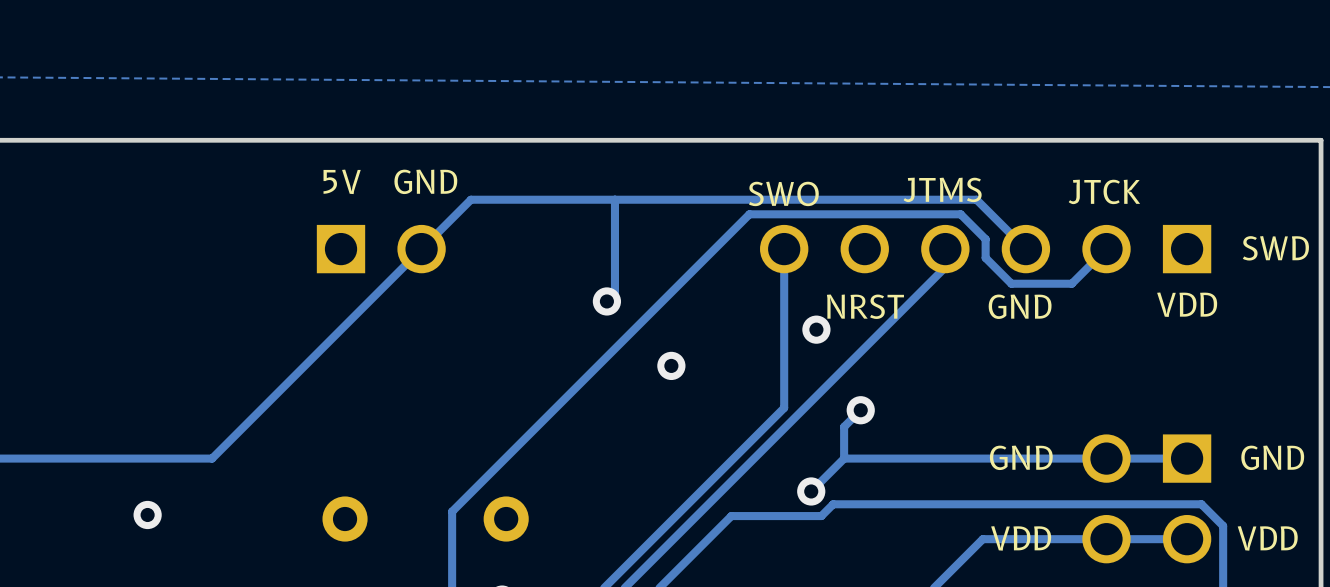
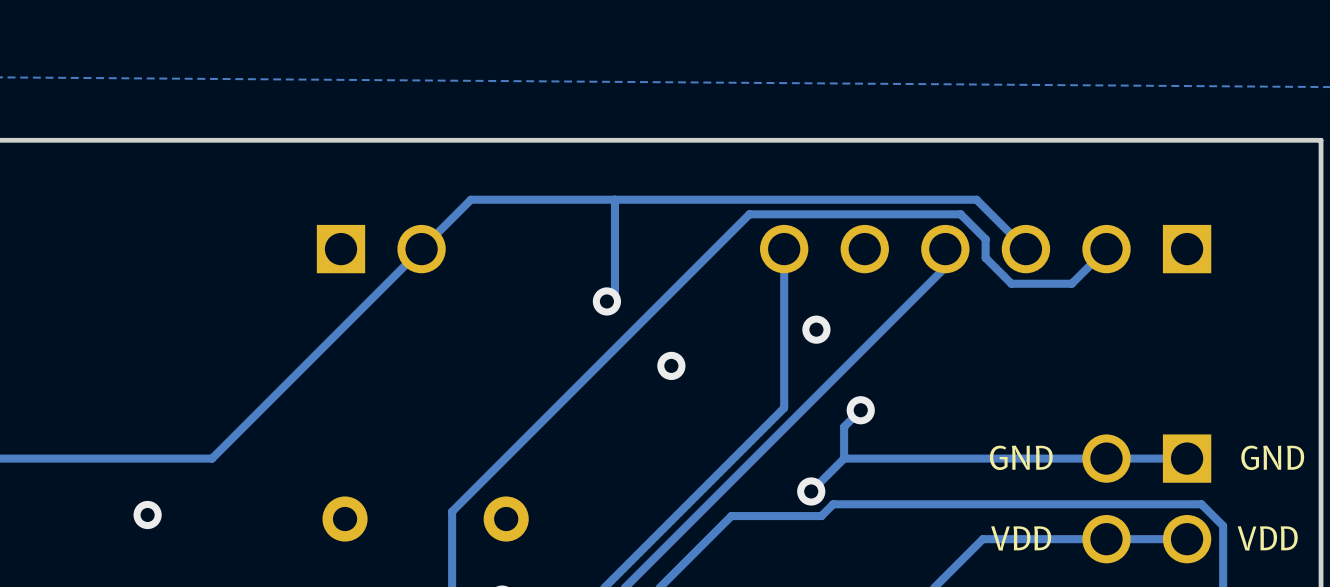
text: 5V (342, 181) -> none
text: GND (425, 181) -> none
text: JTMS (942, 189) -> none
text: JTCK (1104, 191) -> none
text: SWO (783, 193) -> none
text: SWD (1275, 248) -> none
text: VDD (1187, 304) -> none
text: NRST (865, 306) -> none
text: GND (1020, 306) -> none

